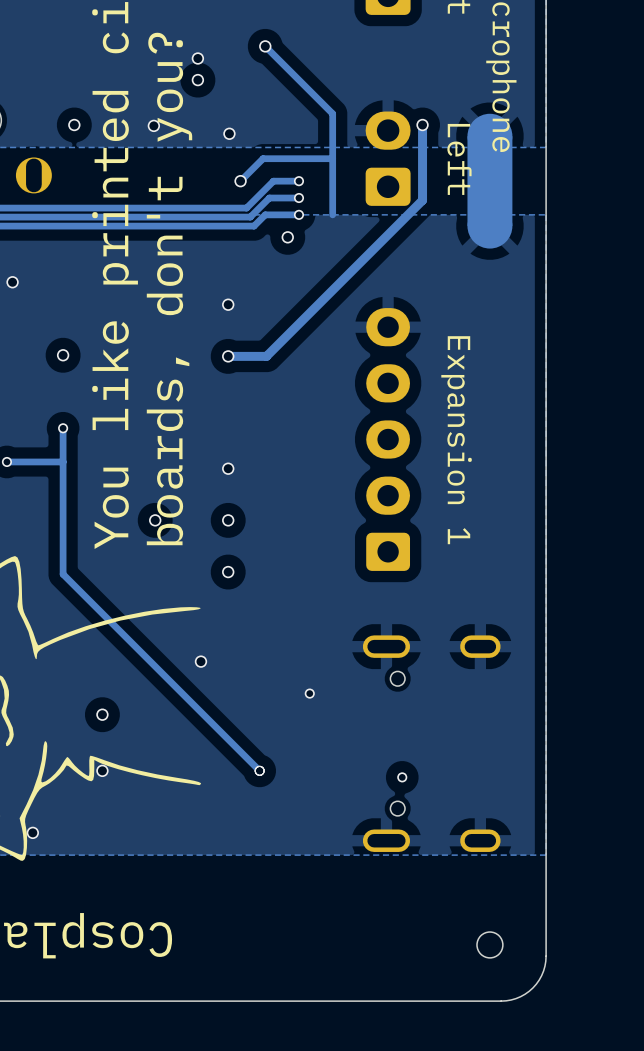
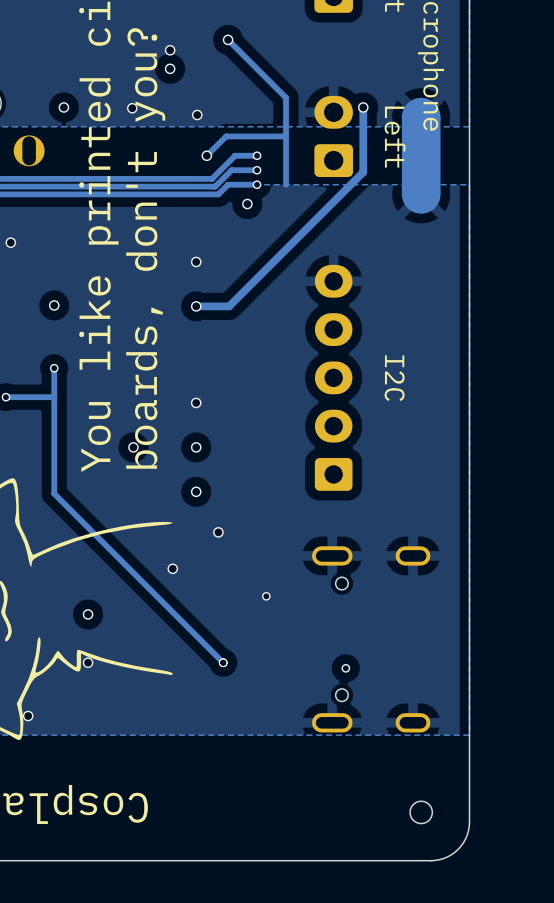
text: Expansion 1 (456, 440) -> I2C (394, 378)
via: none -> (218, 532)

